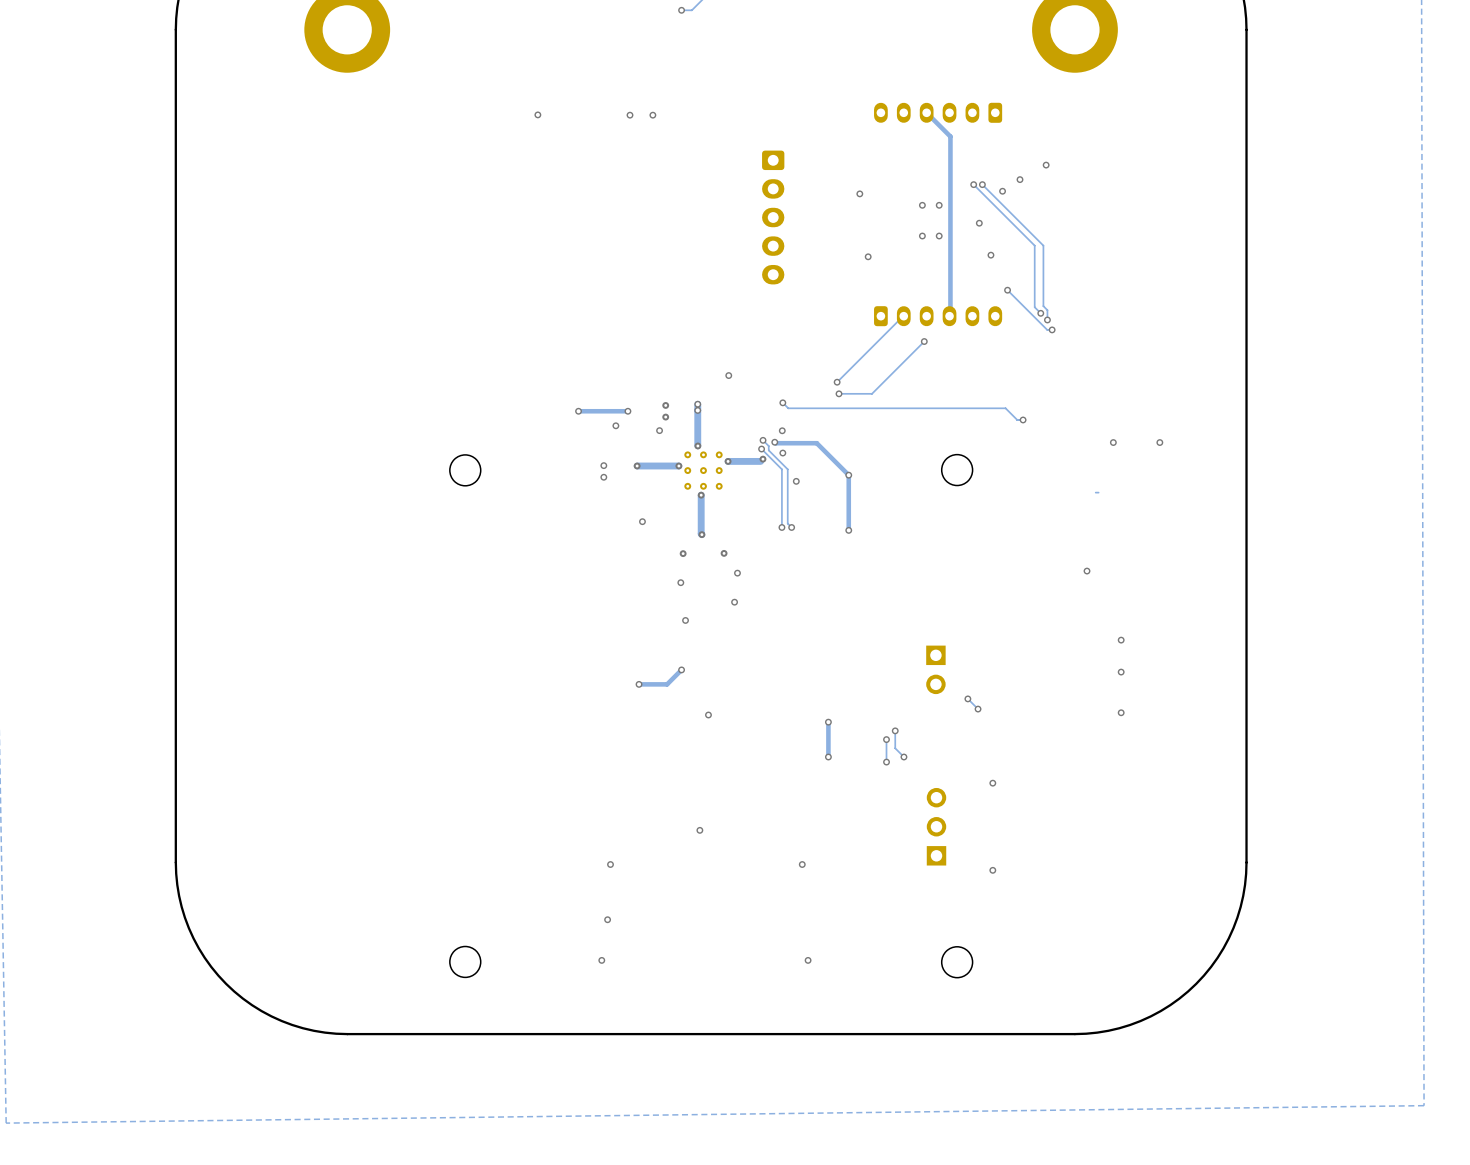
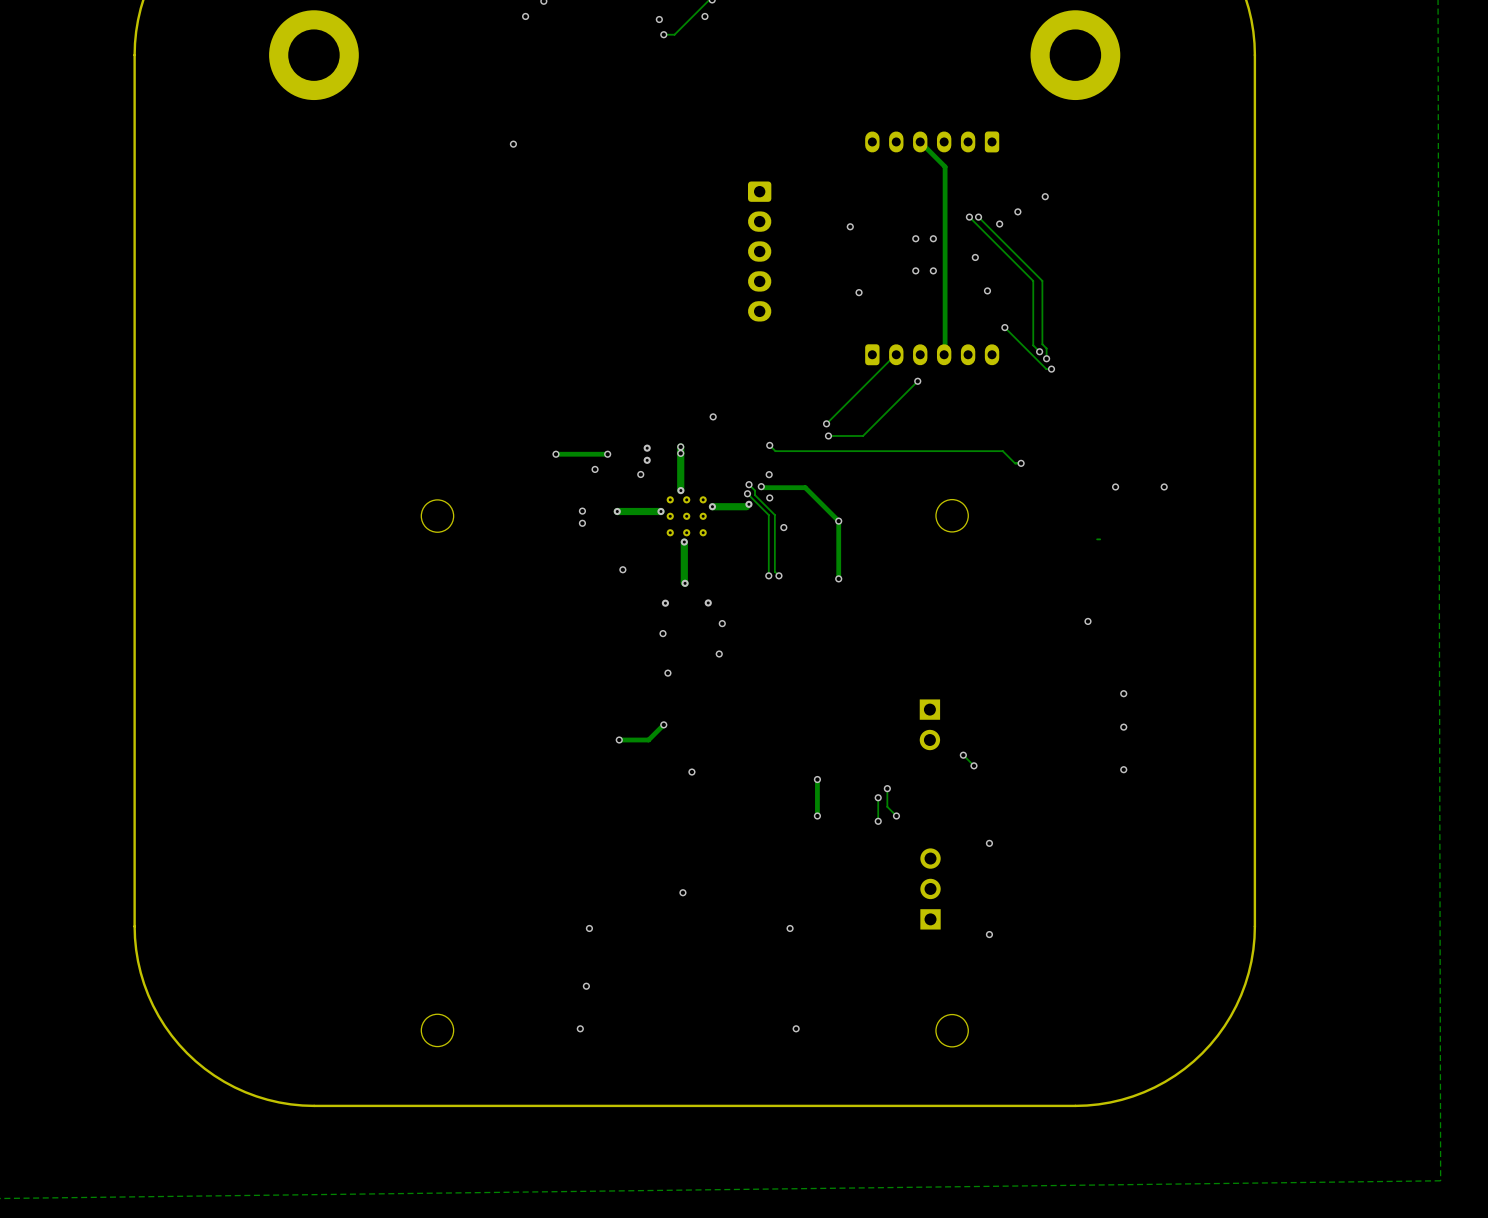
via: (629, 115) -> none
via: (652, 115) -> none

